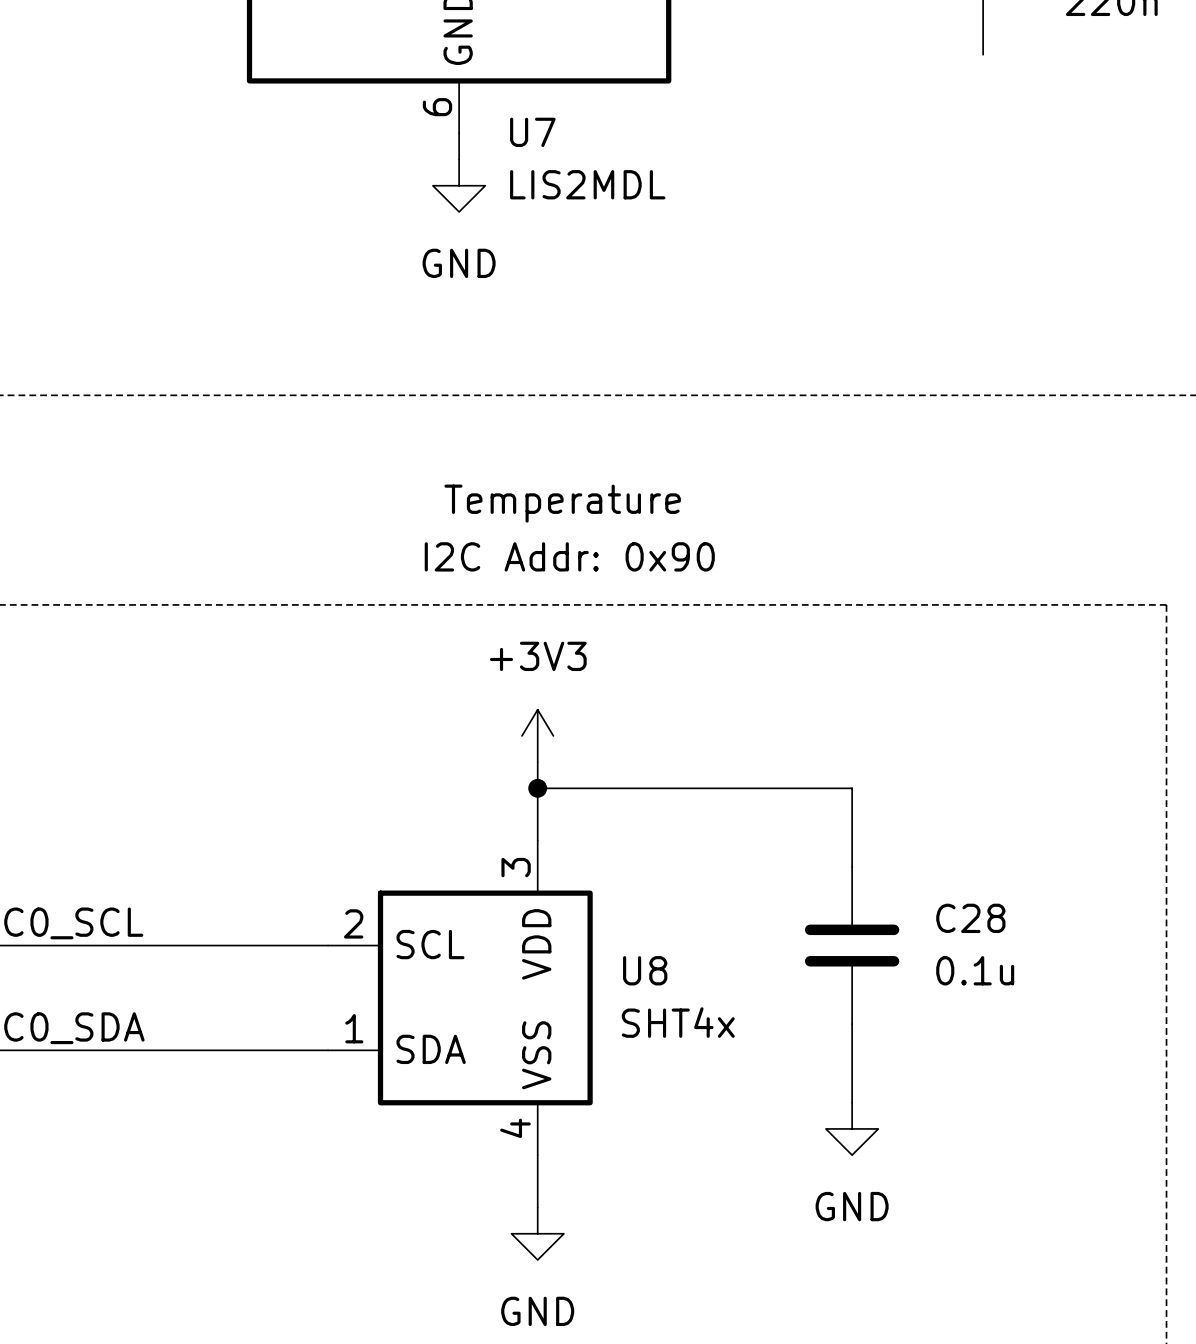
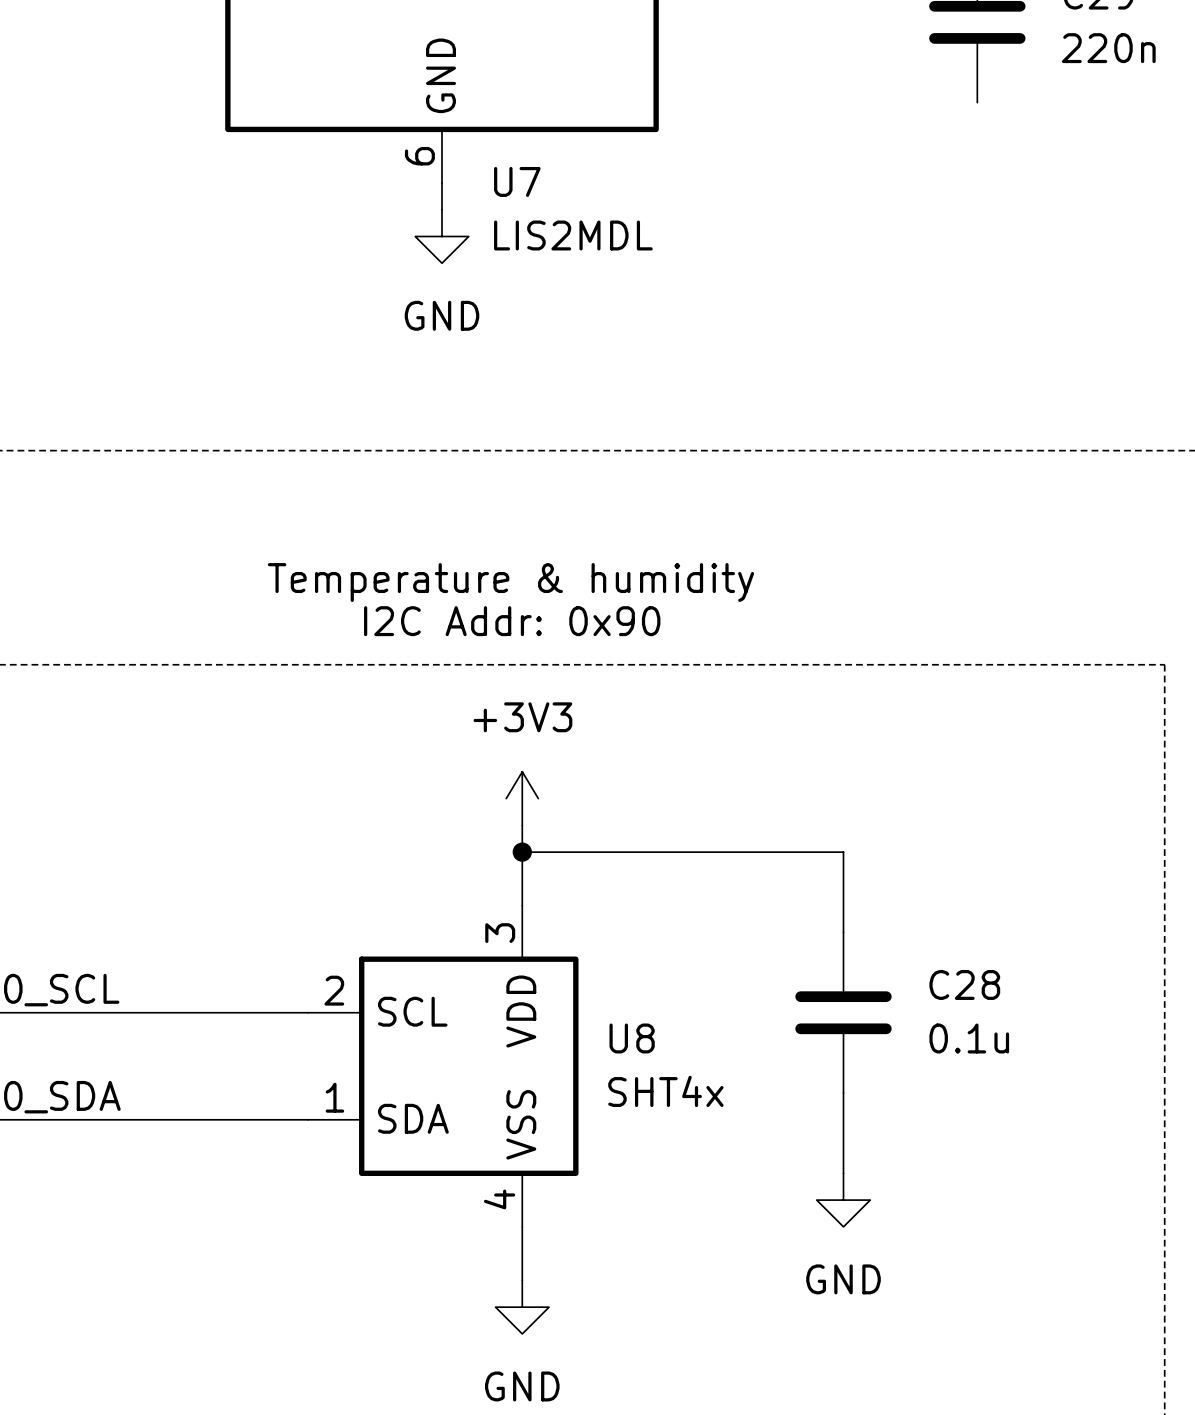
text: Temperature (562, 503) -> Temperature & humidity (510, 582)
text position: I2C Addr: 0x90 (569, 556) -> I2C Addr: 0x90 (512, 621)

